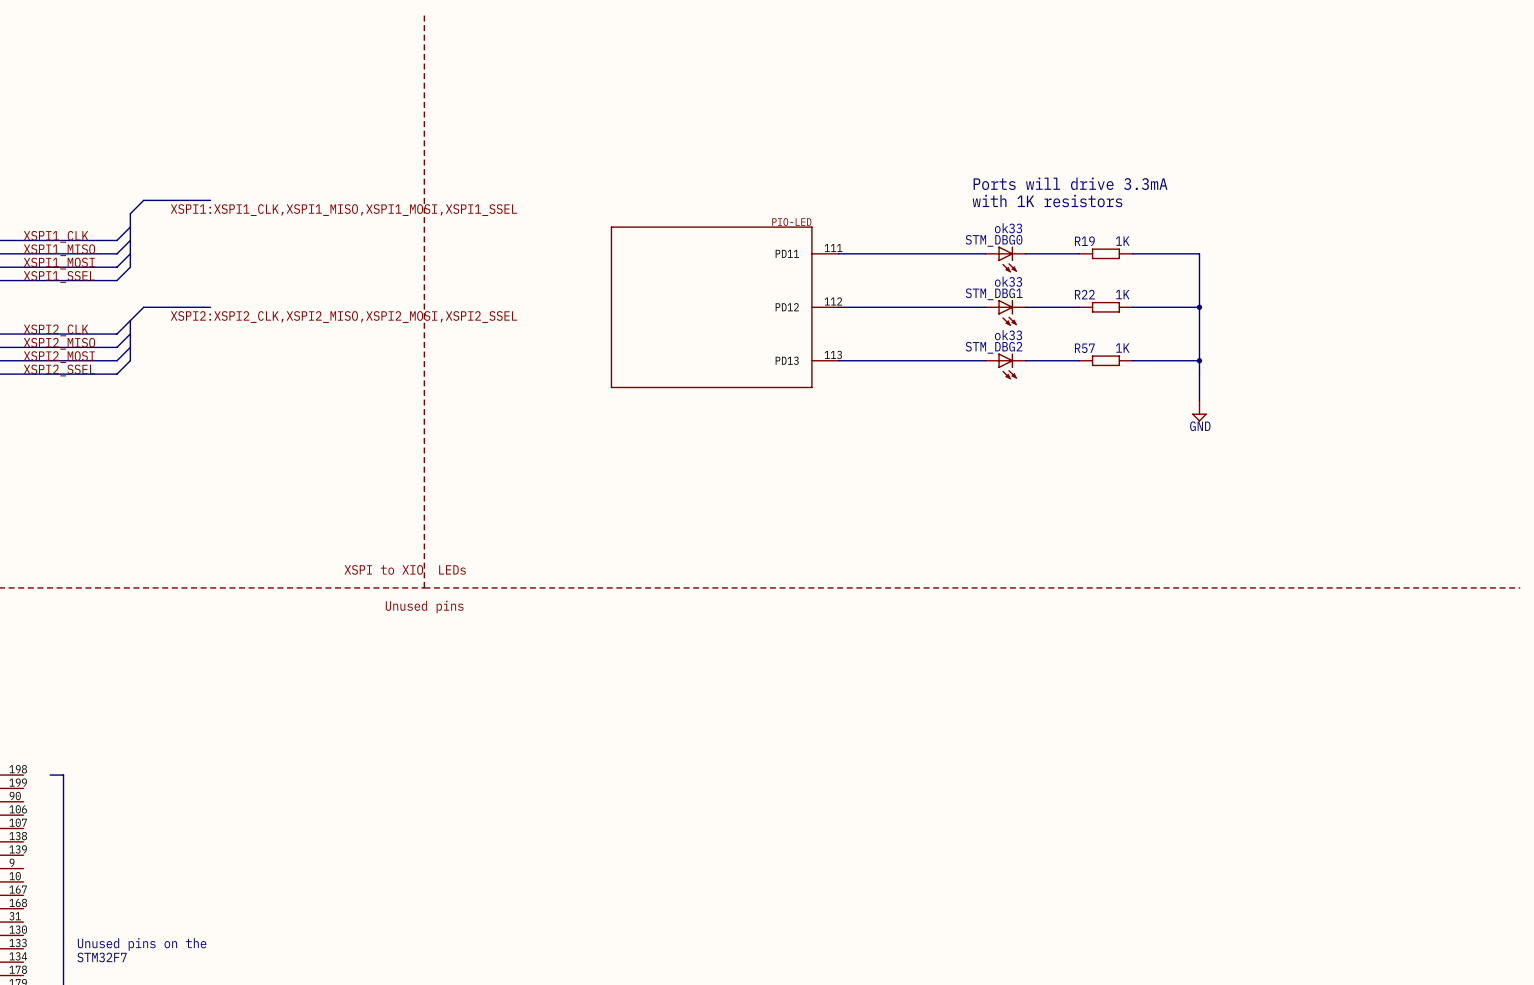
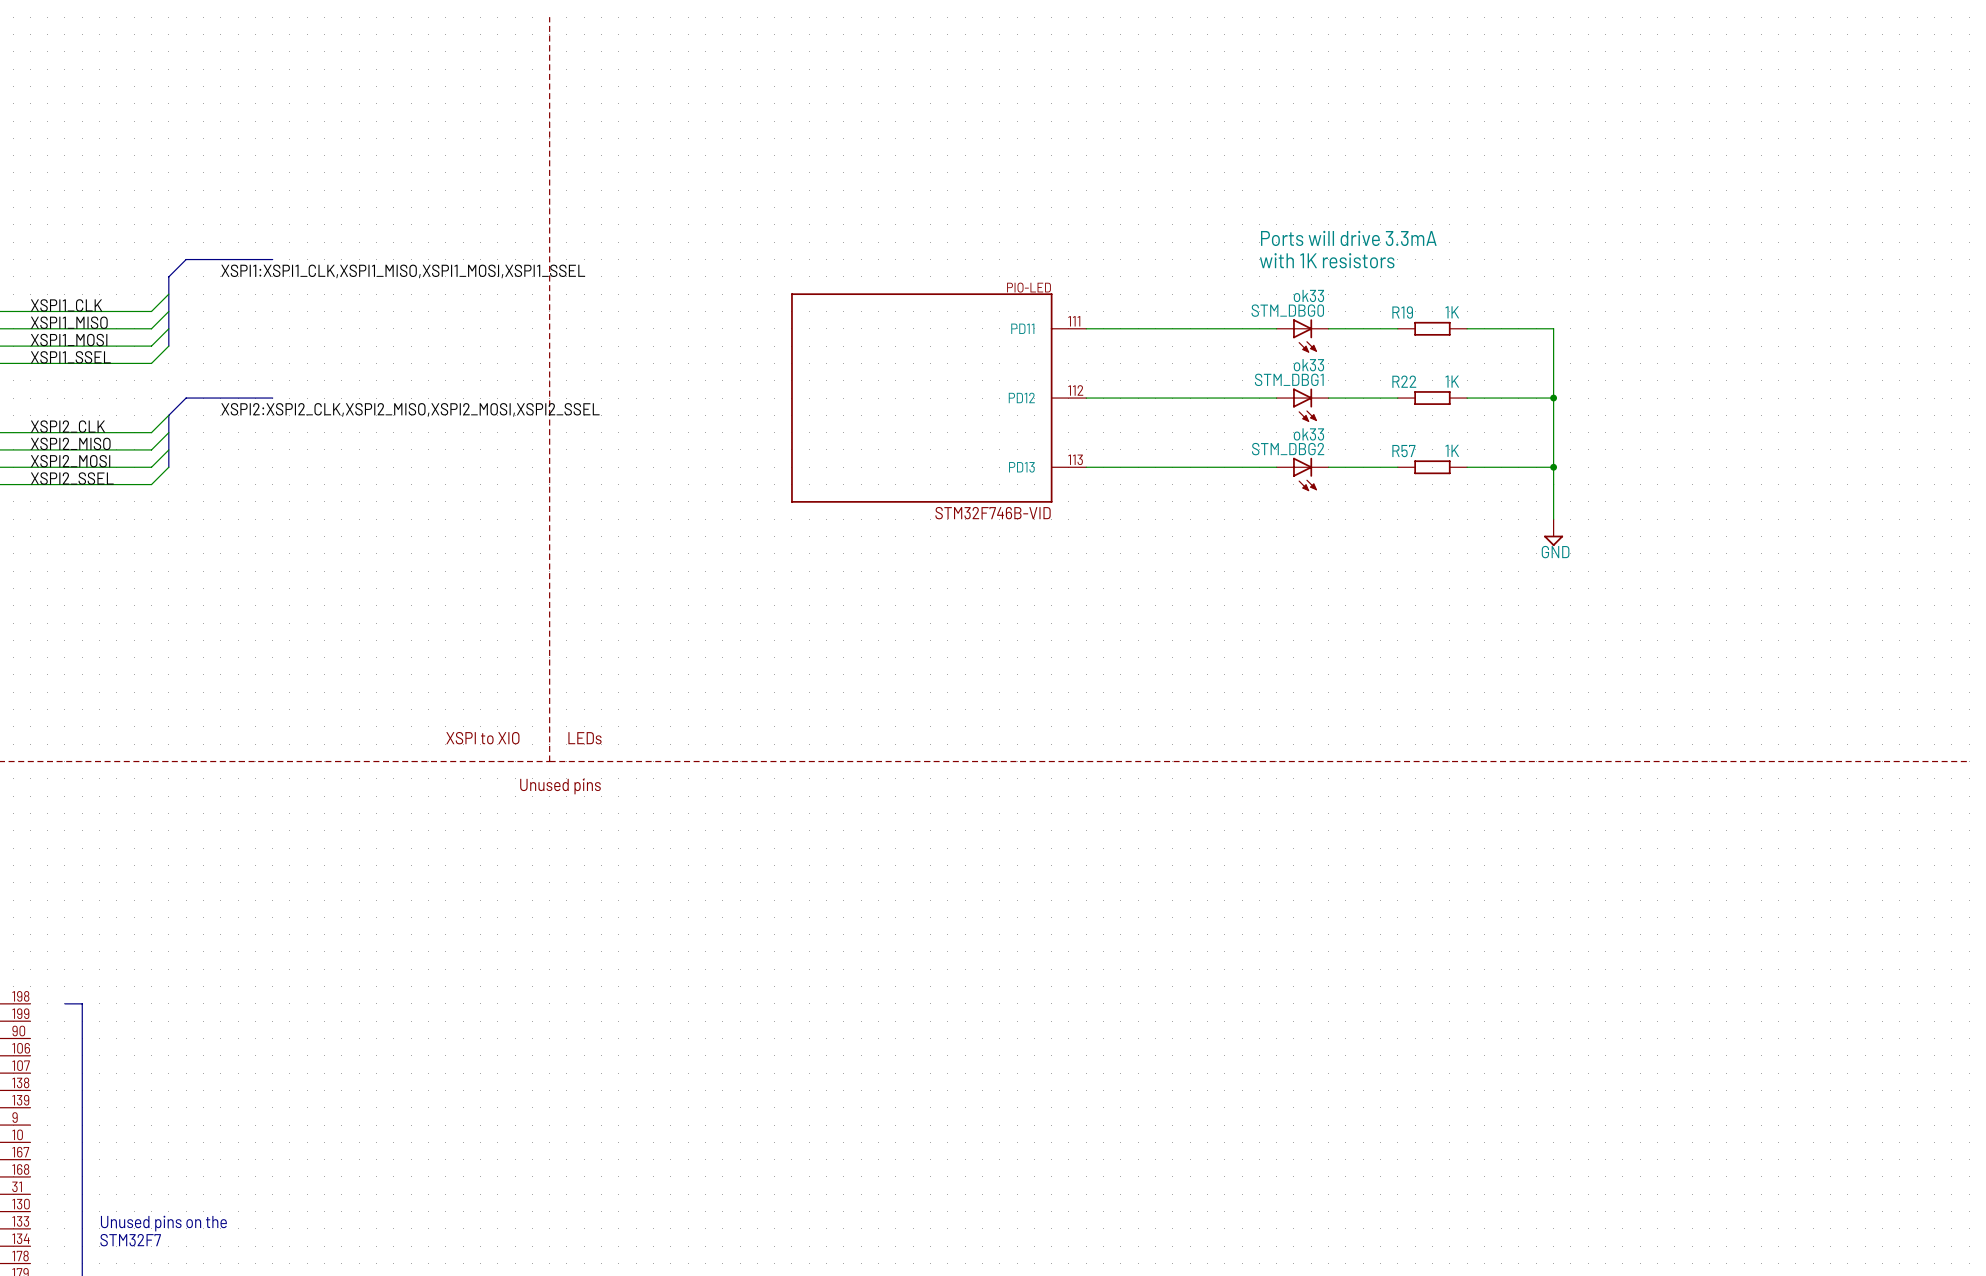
PIO-LED value: none -> STM32F746B-VID (993, 513)

